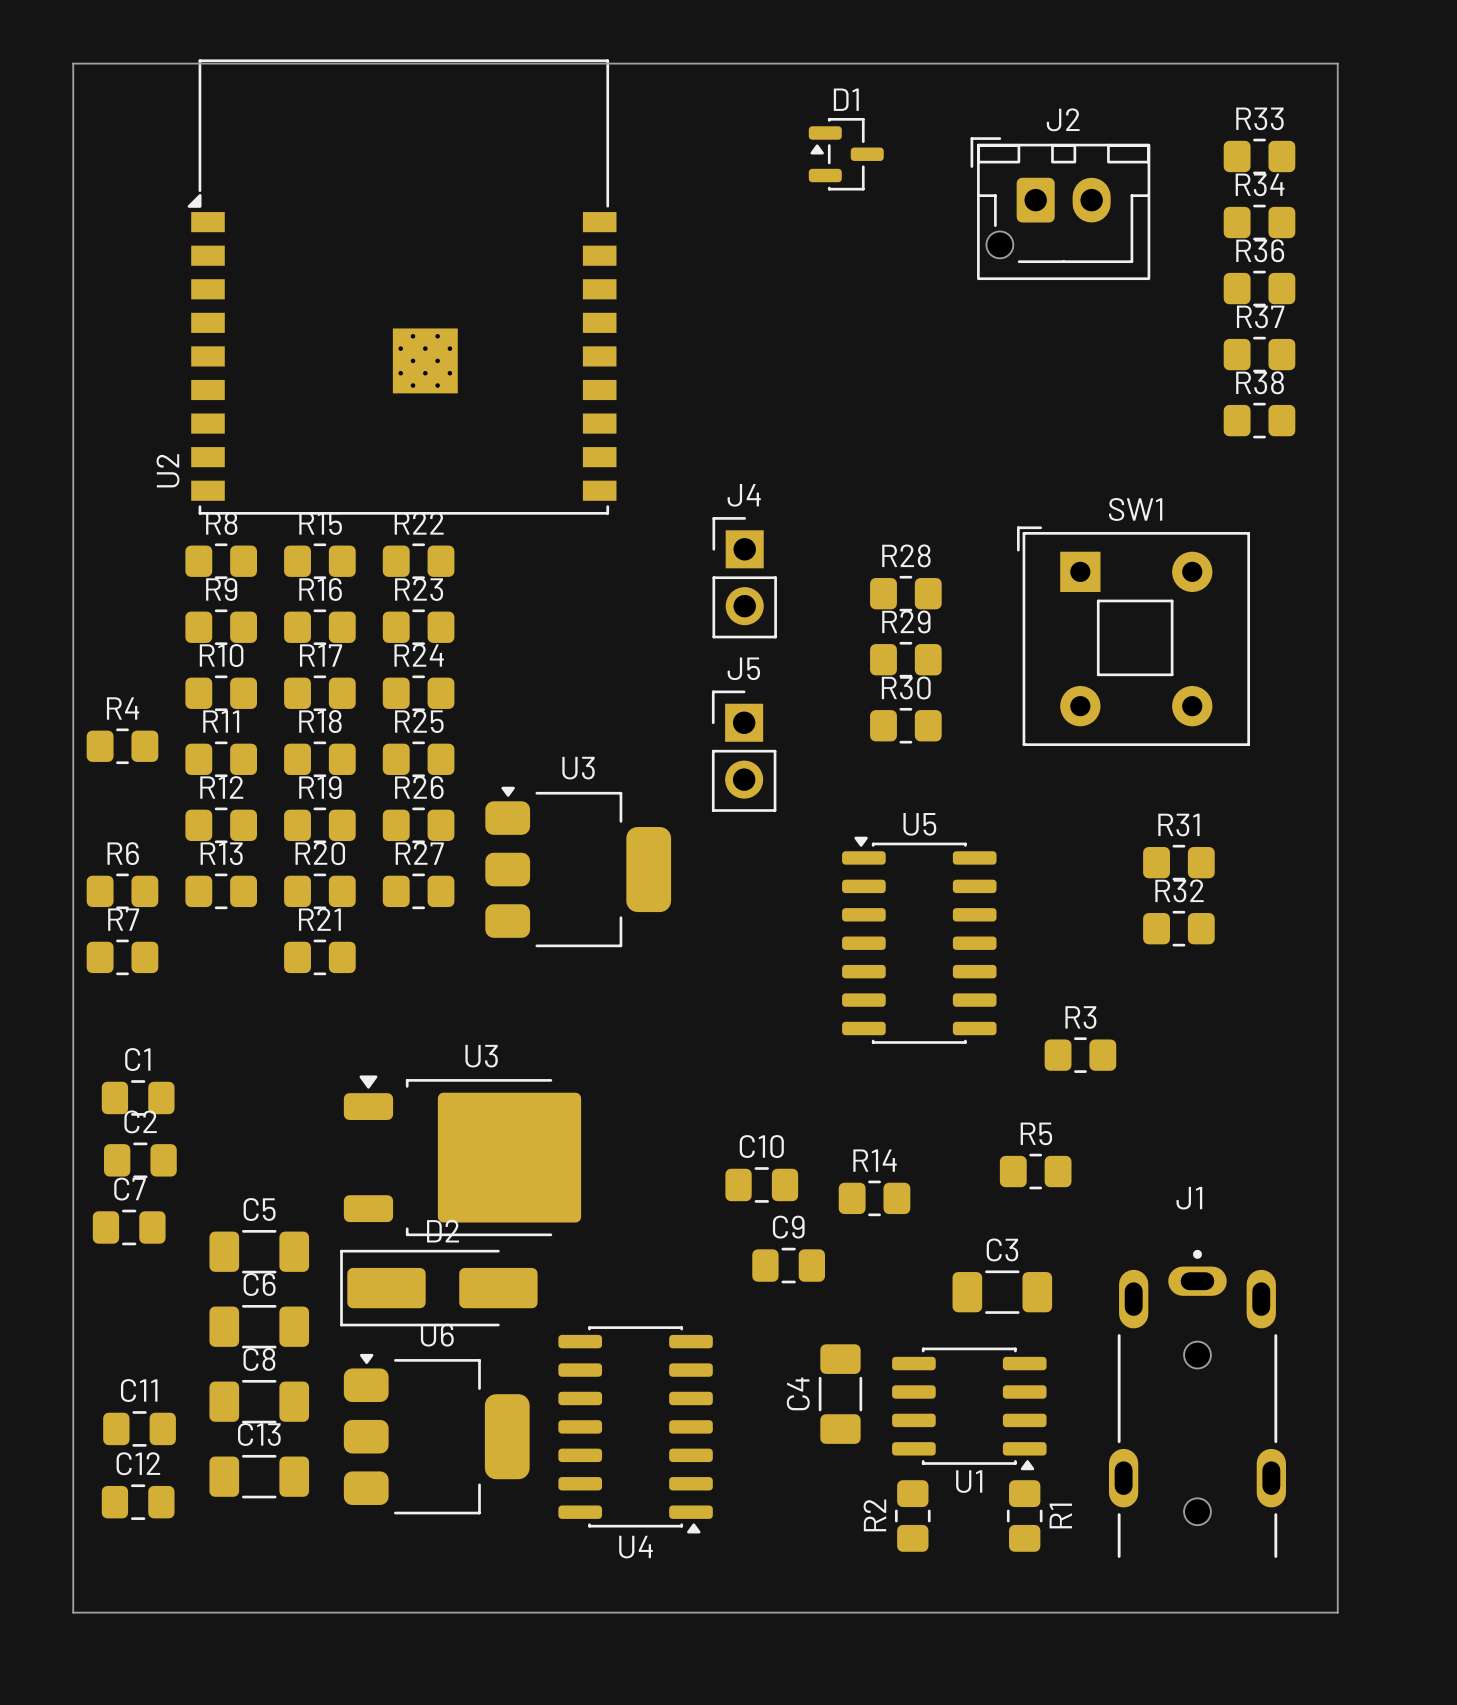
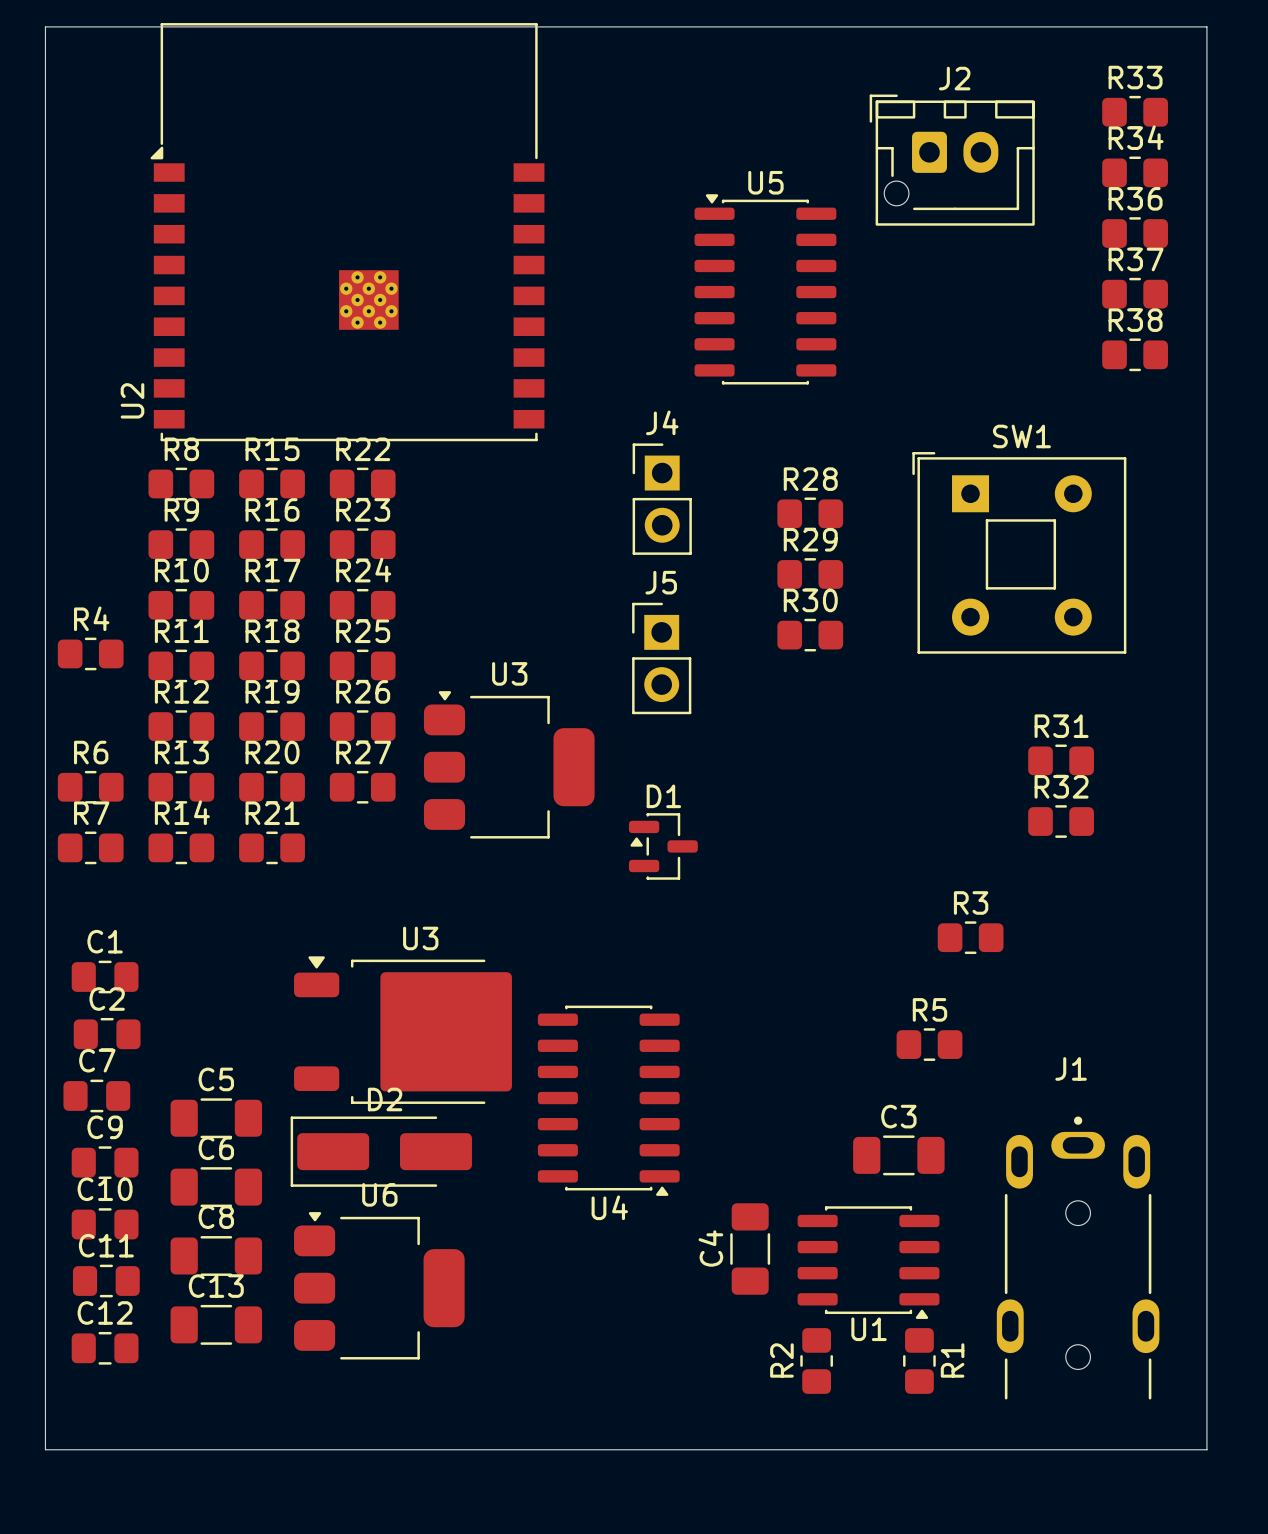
D1 position: (846, 154) -> (663, 846)
U5 position: (919, 940) -> (765, 289)
C10 position: (761, 1184) -> (105, 1224)
R14 position: (874, 1198) -> (181, 847)
C9 position: (788, 1265) -> (105, 1162)
U4 position: (635, 1429) -> (608, 1100)

